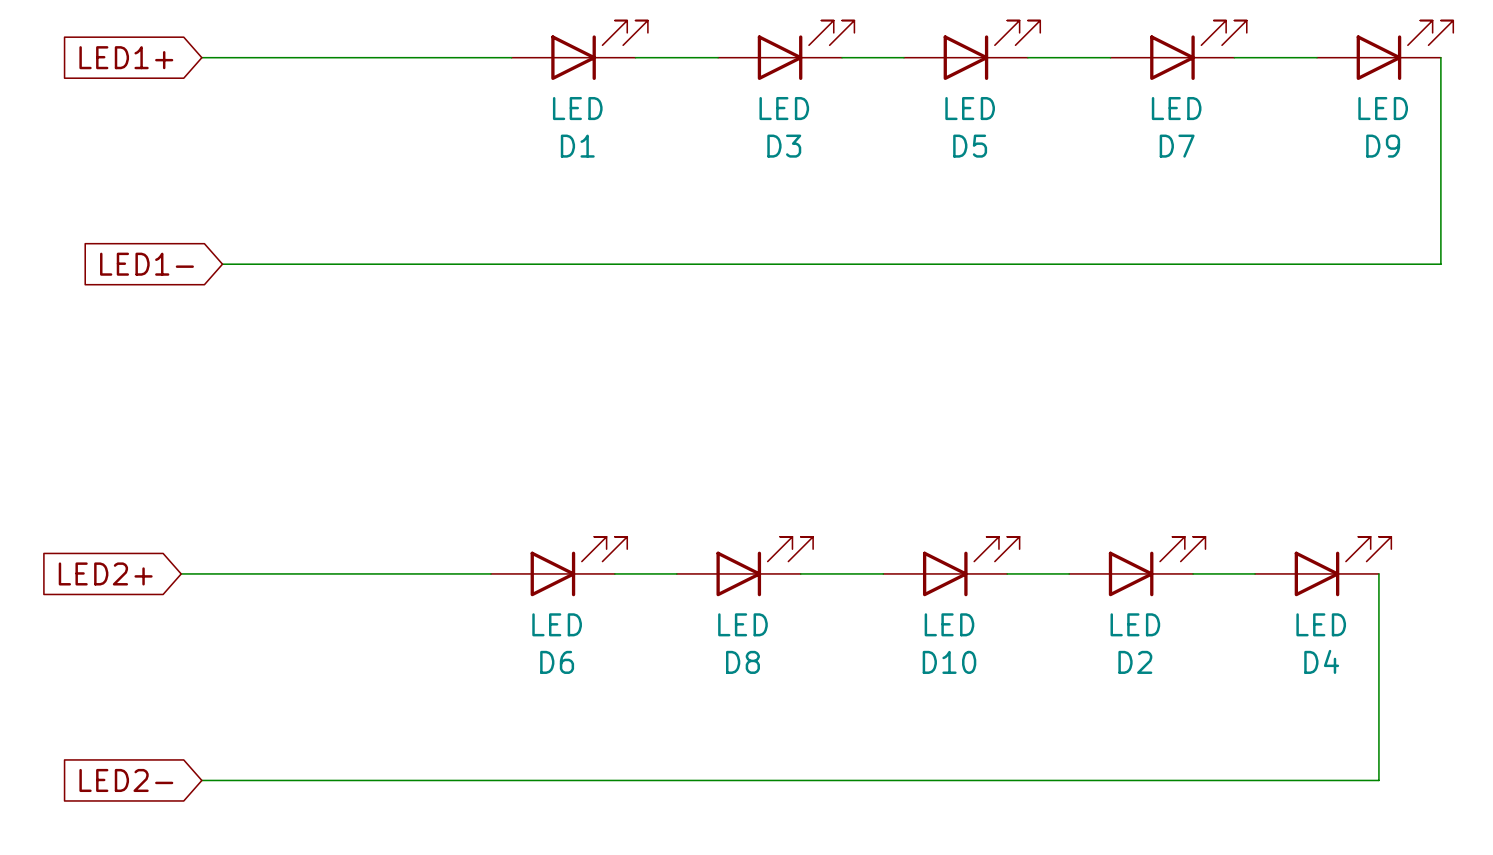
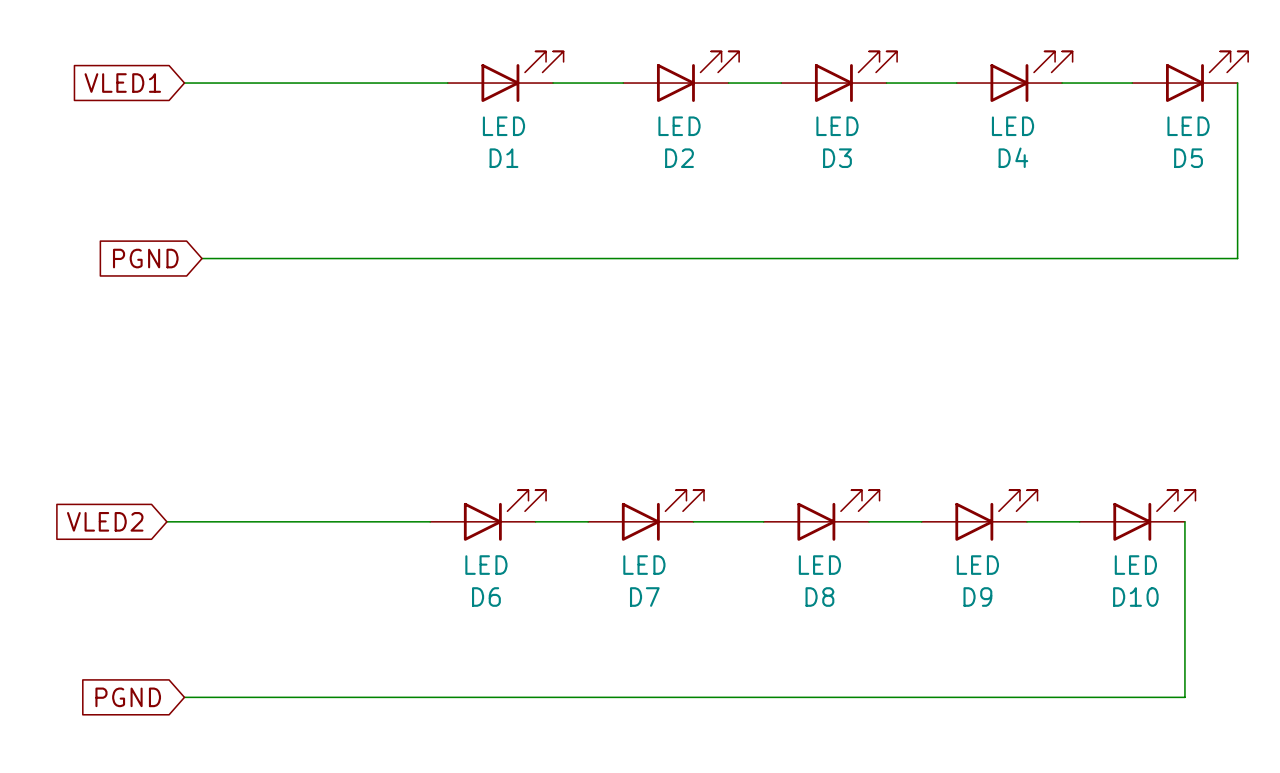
global label: LED1+ (126, 57) -> VLED1 (122, 83)
D3 name: D3 (784, 146) -> D2 (679, 158)
D5 name: D5 (970, 146) -> D3 (837, 158)
D7 name: D7 (1177, 146) -> D4 (1013, 157)
D9 name: D9 (1383, 146) -> D5 (1188, 158)
global label: LED1- (146, 264) -> PGND (145, 258)
global label: LED2+ (105, 573) -> VLED2 (105, 521)
D4 name: D4 (1321, 661) -> D10 (1135, 597)
D8 name: D8 (742, 662) -> D7 (644, 597)
D10 name: D10 (949, 662) -> D8 (819, 597)
D2 name: D2 (1135, 662) -> D9 (977, 597)
global label: LED2- (126, 780) -> PGND (128, 697)

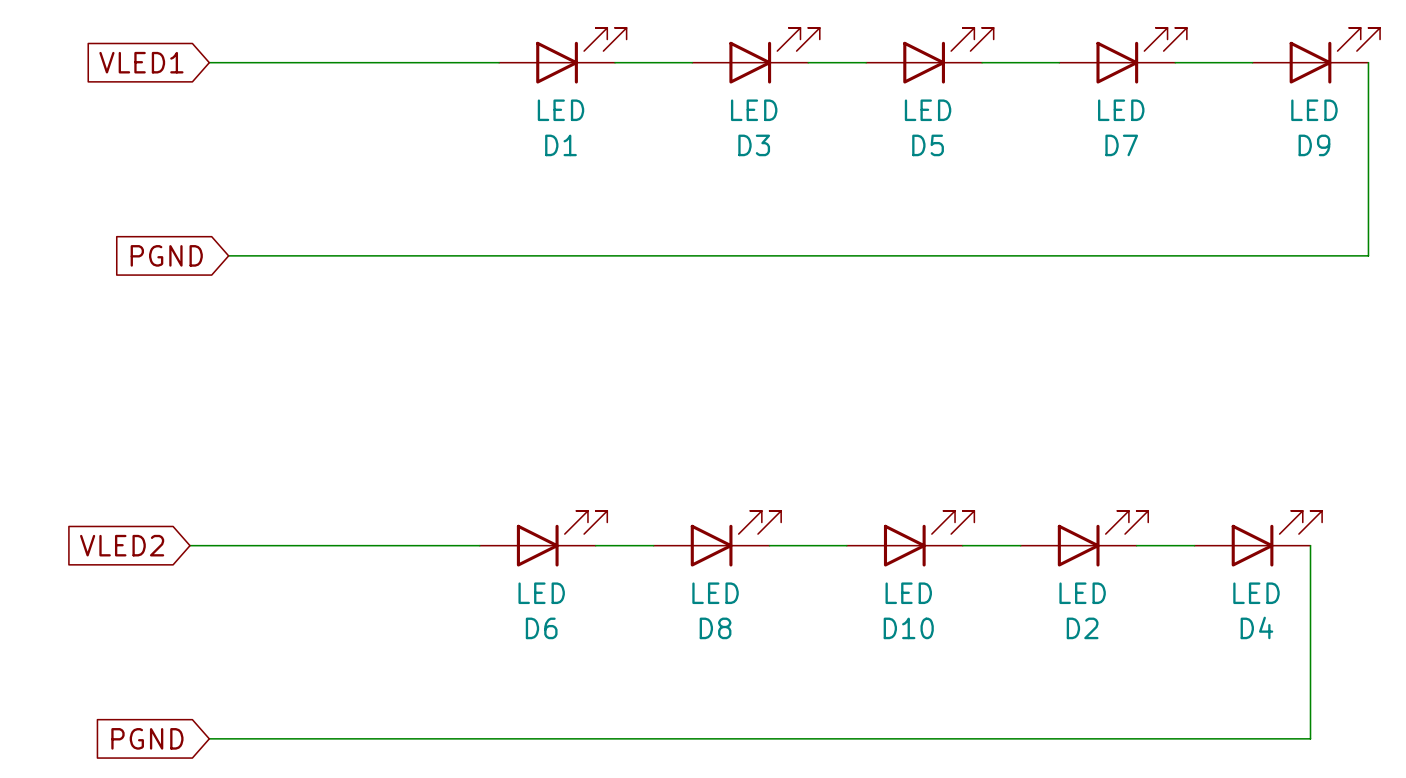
D4 name: D4 (1013, 157) -> D7 (1121, 145)
D2 name: D2 (679, 158) -> D3 (754, 145)
D3 name: D3 (837, 158) -> D5 (928, 145)
D5 name: D5 (1188, 158) -> D9 (1314, 145)
D7 name: D7 (644, 597) -> D8 (715, 628)
D8 name: D8 (819, 597) -> D10 (908, 628)
D9 name: D9 (977, 597) -> D2 (1082, 628)
D10 name: D10 (1135, 597) -> D4 (1256, 627)

